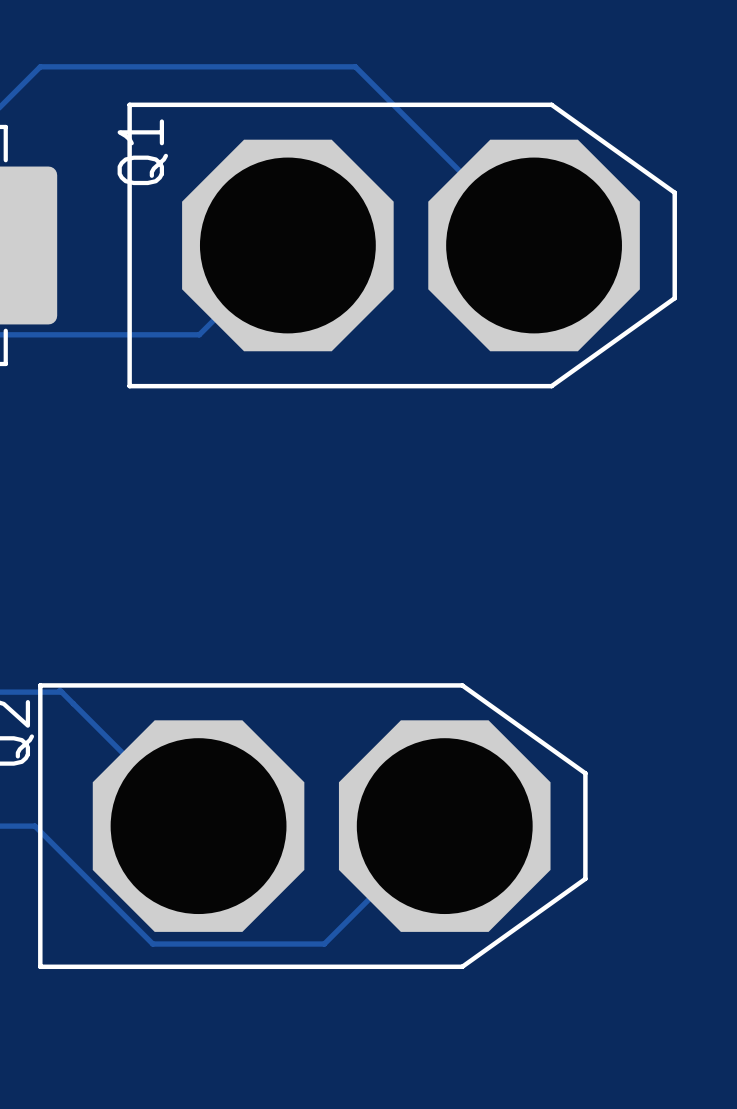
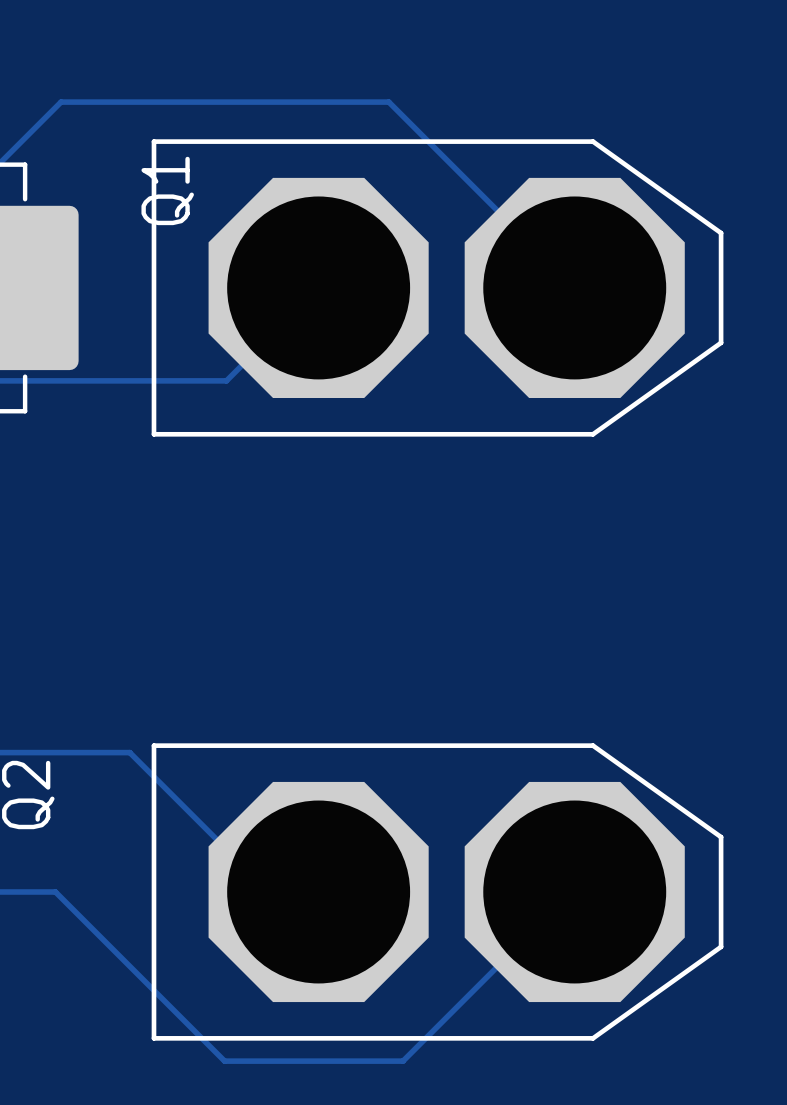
track: (59, 690) (195, 826) (198, 826) -> none
track: none -> (83, 752) (129, 752) (269, 891) (318, 891)
part position: (312, 826) -> (437, 891)
track: (444, 826) (442, 826) (324, 944) (152, 944) -> (574, 891) (572, 891) (403, 1061) (224, 1061) (178, 1014)

